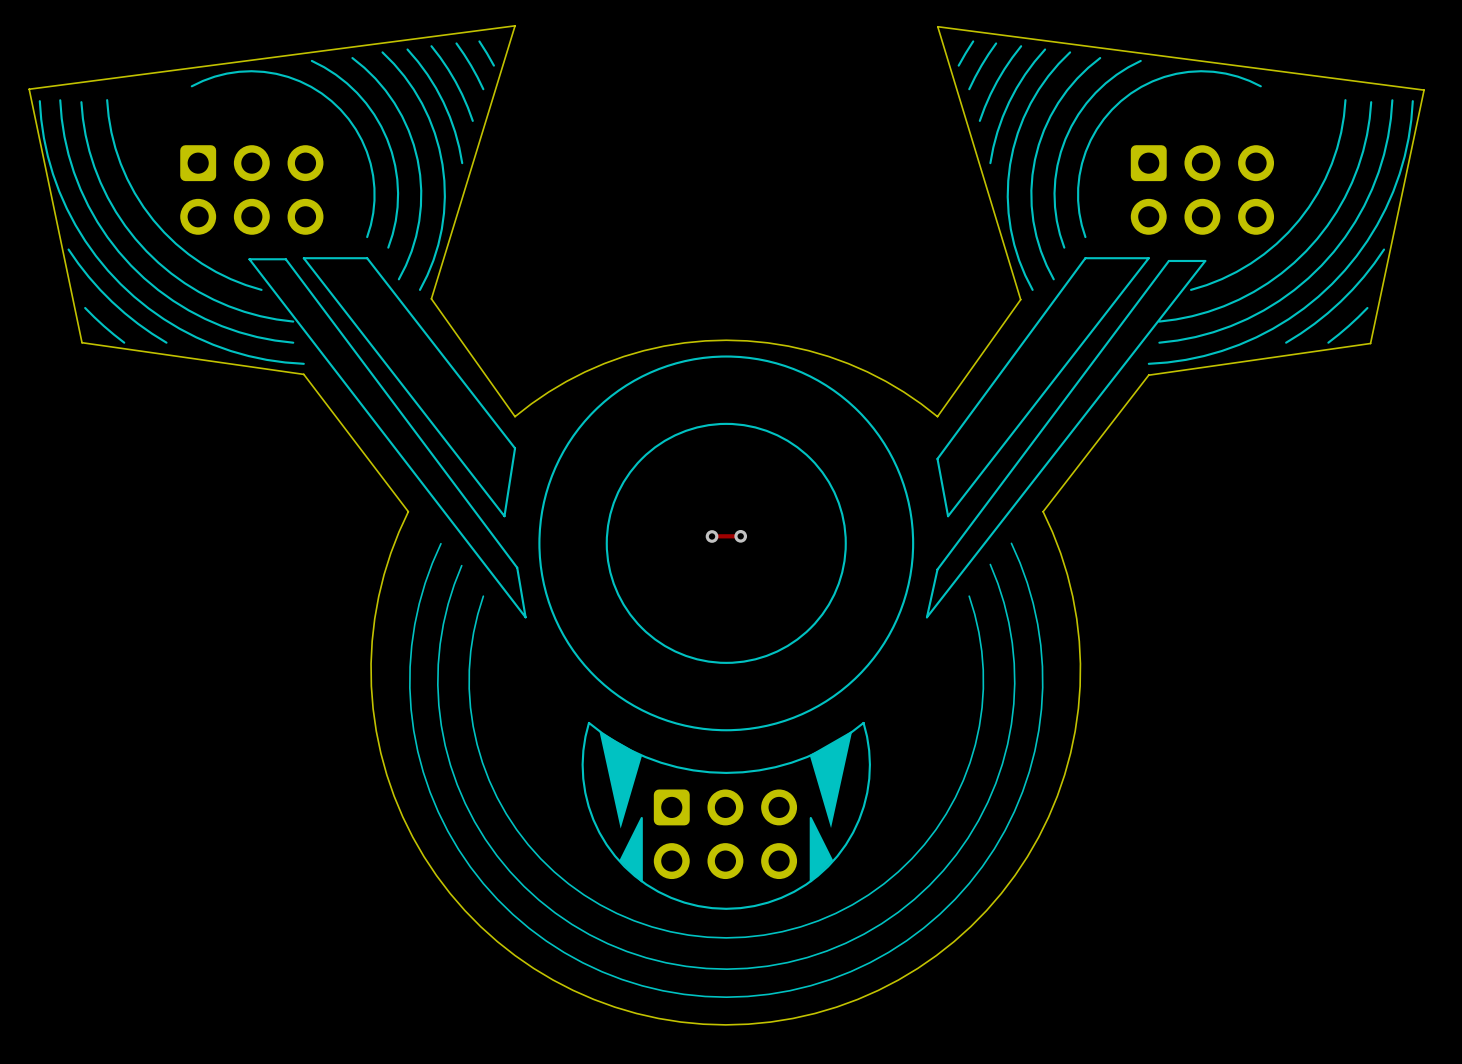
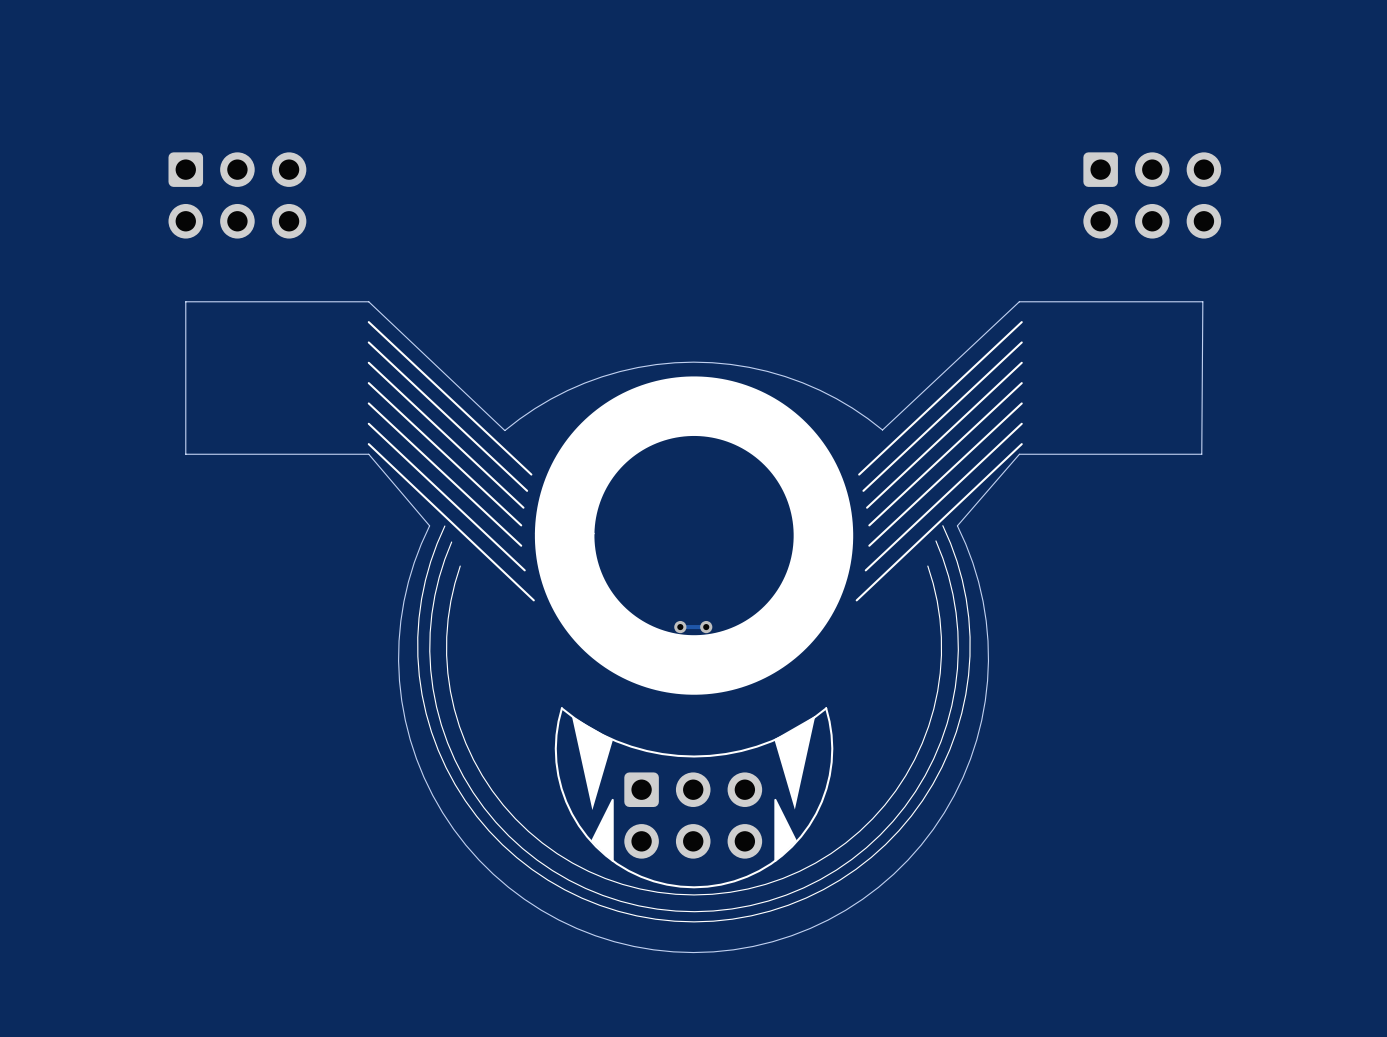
board edge: (515, 25) (431, 298) (515, 416) (566, 381) (623, 356) (684, 342) (726, 340) (767, 342) (828, 356) (885, 381) (937, 416) (1020, 299) (937, 26) (1424, 90) (1370, 343) (1148, 375) (1043, 511) (1060, 553) (1072, 596) (1080, 663) (1075, 731) (1064, 774) (1048, 816) (1014, 875) (970, 926) (917, 968) (878, 990) (836, 1007) (792, 1018) (748, 1024) (703, 1024) (658, 1018) (614, 1007) (573, 990) (533, 968) (497, 941) (464, 910) (424, 856) (402, 816) (380, 753) (373, 708) (372, 641) (384, 574) (408, 511) (303, 374) (82, 342) (29, 89) (515, 25) -> (185, 301) (185, 454) (368, 454) (429, 525) (414, 562) (403, 601) (399, 641) (399, 680) (405, 720) (416, 758) (432, 795) (453, 829) (493, 874) (541, 910) (595, 935) (653, 949) (693, 952) (733, 949) (772, 941) (810, 928) (845, 910) (878, 887) (907, 860) (933, 829) (954, 795) (970, 758) (981, 720) (987, 680) (988, 641) (983, 601) (972, 562) (957, 525) (1019, 454) (1201, 454) (1202, 301) (1019, 301) (882, 430) (852, 408) (802, 382) (749, 367) (693, 362) (656, 364) (602, 376) (550, 399) (504, 430) (368, 301) (185, 301)
line: (479, 41) (493, 65) -> none
line: (973, 41) (958, 65) -> none
line: (456, 43) (483, 89) -> none
line: (996, 43) (969, 89) -> none
line: (431, 46) (455, 81) (472, 120) -> none
line: (1021, 46) (997, 81) (979, 120) -> none
line: (407, 49) (427, 74) (443, 102) (455, 131) (462, 163) -> none
line: (1045, 49) (1025, 74) (1009, 102) (997, 131) (990, 163) -> none
line: (382, 52) (404, 76) (421, 103) (434, 133) (442, 164) (444, 196) (441, 229) (433, 260) (419, 289) -> none
line: (1070, 52) (1048, 76) (1030, 103) (1017, 133) (1010, 164) (1007, 196) (1010, 229) (1019, 260) (1032, 289) -> none
line: (352, 58) (375, 78) (394, 102) (408, 130) (417, 159) (421, 190) (419, 221) (411, 251) (398, 279) -> none
line: (1100, 58) (1077, 78) (1058, 102) (1043, 130) (1034, 159) (1031, 190) (1033, 221) (1040, 251) (1053, 279) -> none
line: (311, 60) (335, 74) (356, 92) (374, 114) (387, 139) (395, 165) (398, 193) (395, 220) (388, 247) -> none
line: (1140, 60) (1116, 74) (1095, 92) (1078, 114) (1065, 139) (1057, 165) (1054, 193) (1056, 220) (1064, 247) -> none
line: (191, 86) (226, 73) (264, 71) (300, 81) (331, 101) (355, 129) (370, 163) (374, 200) (367, 237) -> none
line: (1260, 86) (1225, 73) (1188, 71) (1152, 81) (1121, 101) (1096, 129) (1082, 163) (1078, 200) (1085, 237) -> none
line: (60, 100) (64, 136) (80, 189) (107, 237) (130, 265) (158, 290) (205, 318) (239, 332) (293, 342) -> none
line: (107, 100) (111, 132) (120, 163) (134, 193) (153, 220) (175, 243) (201, 263) (230, 279) (261, 289) -> none
line: (1345, 100) (1341, 132) (1331, 163) (1317, 193) (1299, 220) (1276, 243) (1250, 263) (1221, 279) (1191, 289) -> none
line: (1392, 100) (1388, 136) (1372, 189) (1355, 221) (1321, 265) (1294, 290) (1247, 318) (1213, 332) (1159, 342) -> none
line: (39, 101) (43, 138) (59, 191) (85, 240) (120, 284) (163, 319) (213, 344) (266, 359) (303, 363) -> none
line: (1412, 101) (1404, 156) (1385, 208) (1367, 240) (1332, 284) (1304, 308) (1256, 337) (1203, 356) (1148, 363) -> none
line: (81, 102) (89, 151) (100, 182) (125, 225) (146, 251) (184, 283) (213, 299) (244, 311) (293, 321) -> none
line: (1371, 102) (1363, 151) (1352, 182) (1327, 225) (1306, 251) (1281, 273) (1239, 299) (1192, 316) (1159, 321) -> none
line: (68, 249) (88, 276) (112, 301) (138, 323) (166, 342) -> none
line: (1384, 249) (1363, 276) (1340, 301) (1314, 323) (1286, 342) -> none
line: (303, 258) (367, 258) (515, 448) (504, 516) (303, 258) -> none
line: (1085, 258) (1148, 258) (948, 516) (937, 458) (1085, 258) -> none
line: (249, 259) (285, 259) (517, 567) (525, 617) (249, 259) -> none
line: (1168, 260) (937, 569) (926, 617) (1205, 260) (1168, 260) -> none
line: (85, 308) (124, 342) -> none
line: (1367, 308) (1328, 342) -> none
line: none -> (368, 322) (531, 474)
line: none -> (1021, 322) (859, 474)
line: none -> (368, 342) (527, 490)
line: none -> (1021, 342) (863, 490)
drawing: [538, 355, 915, 732] -> none
line: none -> (368, 362) (523, 507)
line: none -> (1021, 362) (867, 507)
drawing: none -> [534, 376, 854, 695]
line: none -> (368, 383) (521, 525)
line: none -> (1021, 383) (869, 525)
line: none -> (368, 403) (521, 545)
line: none -> (1021, 403) (869, 545)
line: none -> (368, 423) (524, 570)
line: none -> (1021, 423) (865, 570)
line: none -> (368, 444) (533, 600)
line: none -> (1021, 444) (856, 600)
line: none -> (942, 525) (962, 579) (968, 617) (969, 656) (961, 713) (949, 749) (932, 784) (911, 816) (885, 844) (840, 880) (806, 898) (770, 911) (732, 919) (694, 921) (636, 915) (599, 905) (564, 889) (532, 869) (502, 844) (476, 816) (455, 784) (431, 732) (422, 694) (417, 656) (419, 618) (425, 580) (444, 526)
track: (712, 536) (740, 536) -> none
via: (712, 536) -> none
via: (740, 536) -> none
line: (1011, 543) (1027, 582) (1037, 624) (1042, 666) (1041, 709) (1034, 751) (1022, 791) (994, 849) (969, 883) (939, 914) (888, 952) (850, 971) (810, 985) (768, 994) (726, 997) (663, 990) (621, 979) (582, 962) (546, 940) (512, 914) (483, 883) (458, 849) (438, 811) (423, 772) (411, 709) (410, 666) (414, 624) (425, 583) (440, 543) -> none
line: none -> (935, 540) (948, 576) (956, 612) (957, 668) (947, 723) (933, 758) (915, 791) (880, 835) (851, 859) (820, 879) (786, 895) (750, 905) (694, 911) (638, 905) (602, 895) (568, 880) (522, 848) (495, 822) (473, 792) (454, 759) (441, 725) (430, 670) (430, 632) (434, 595) (451, 542)
line: (990, 564) (1004, 602) (1012, 642) (1013, 704) (1007, 744) (995, 783) (968, 838) (943, 870) (914, 899) (864, 934) (807, 957) (767, 966) (726, 969) (666, 962) (626, 951) (589, 934) (539, 900) (509, 871) (485, 839) (457, 784) (445, 745) (438, 705) (438, 664) (443, 624) (461, 565) -> none
line: (483, 596) (473, 632) (469, 669) (473, 726) (489, 780) (516, 829) (554, 871) (600, 904) (634, 920) (670, 931) (726, 937) (763, 935) (800, 926) (852, 904) (898, 871) (935, 829) (955, 797) (970, 762) (982, 707) (981, 651) (969, 596) -> (460, 566) (450, 601) (446, 637) (450, 691) (465, 743) (492, 790) (528, 831) (572, 863) (622, 884) (657, 892) (694, 894) (748, 888) (782, 878) (815, 863) (859, 831) (895, 790) (922, 743) (937, 691) (941, 637) (937, 601) (927, 566)
track: none -> (680, 627) (706, 627)
via: none -> (680, 627)
via: none -> (706, 627)

